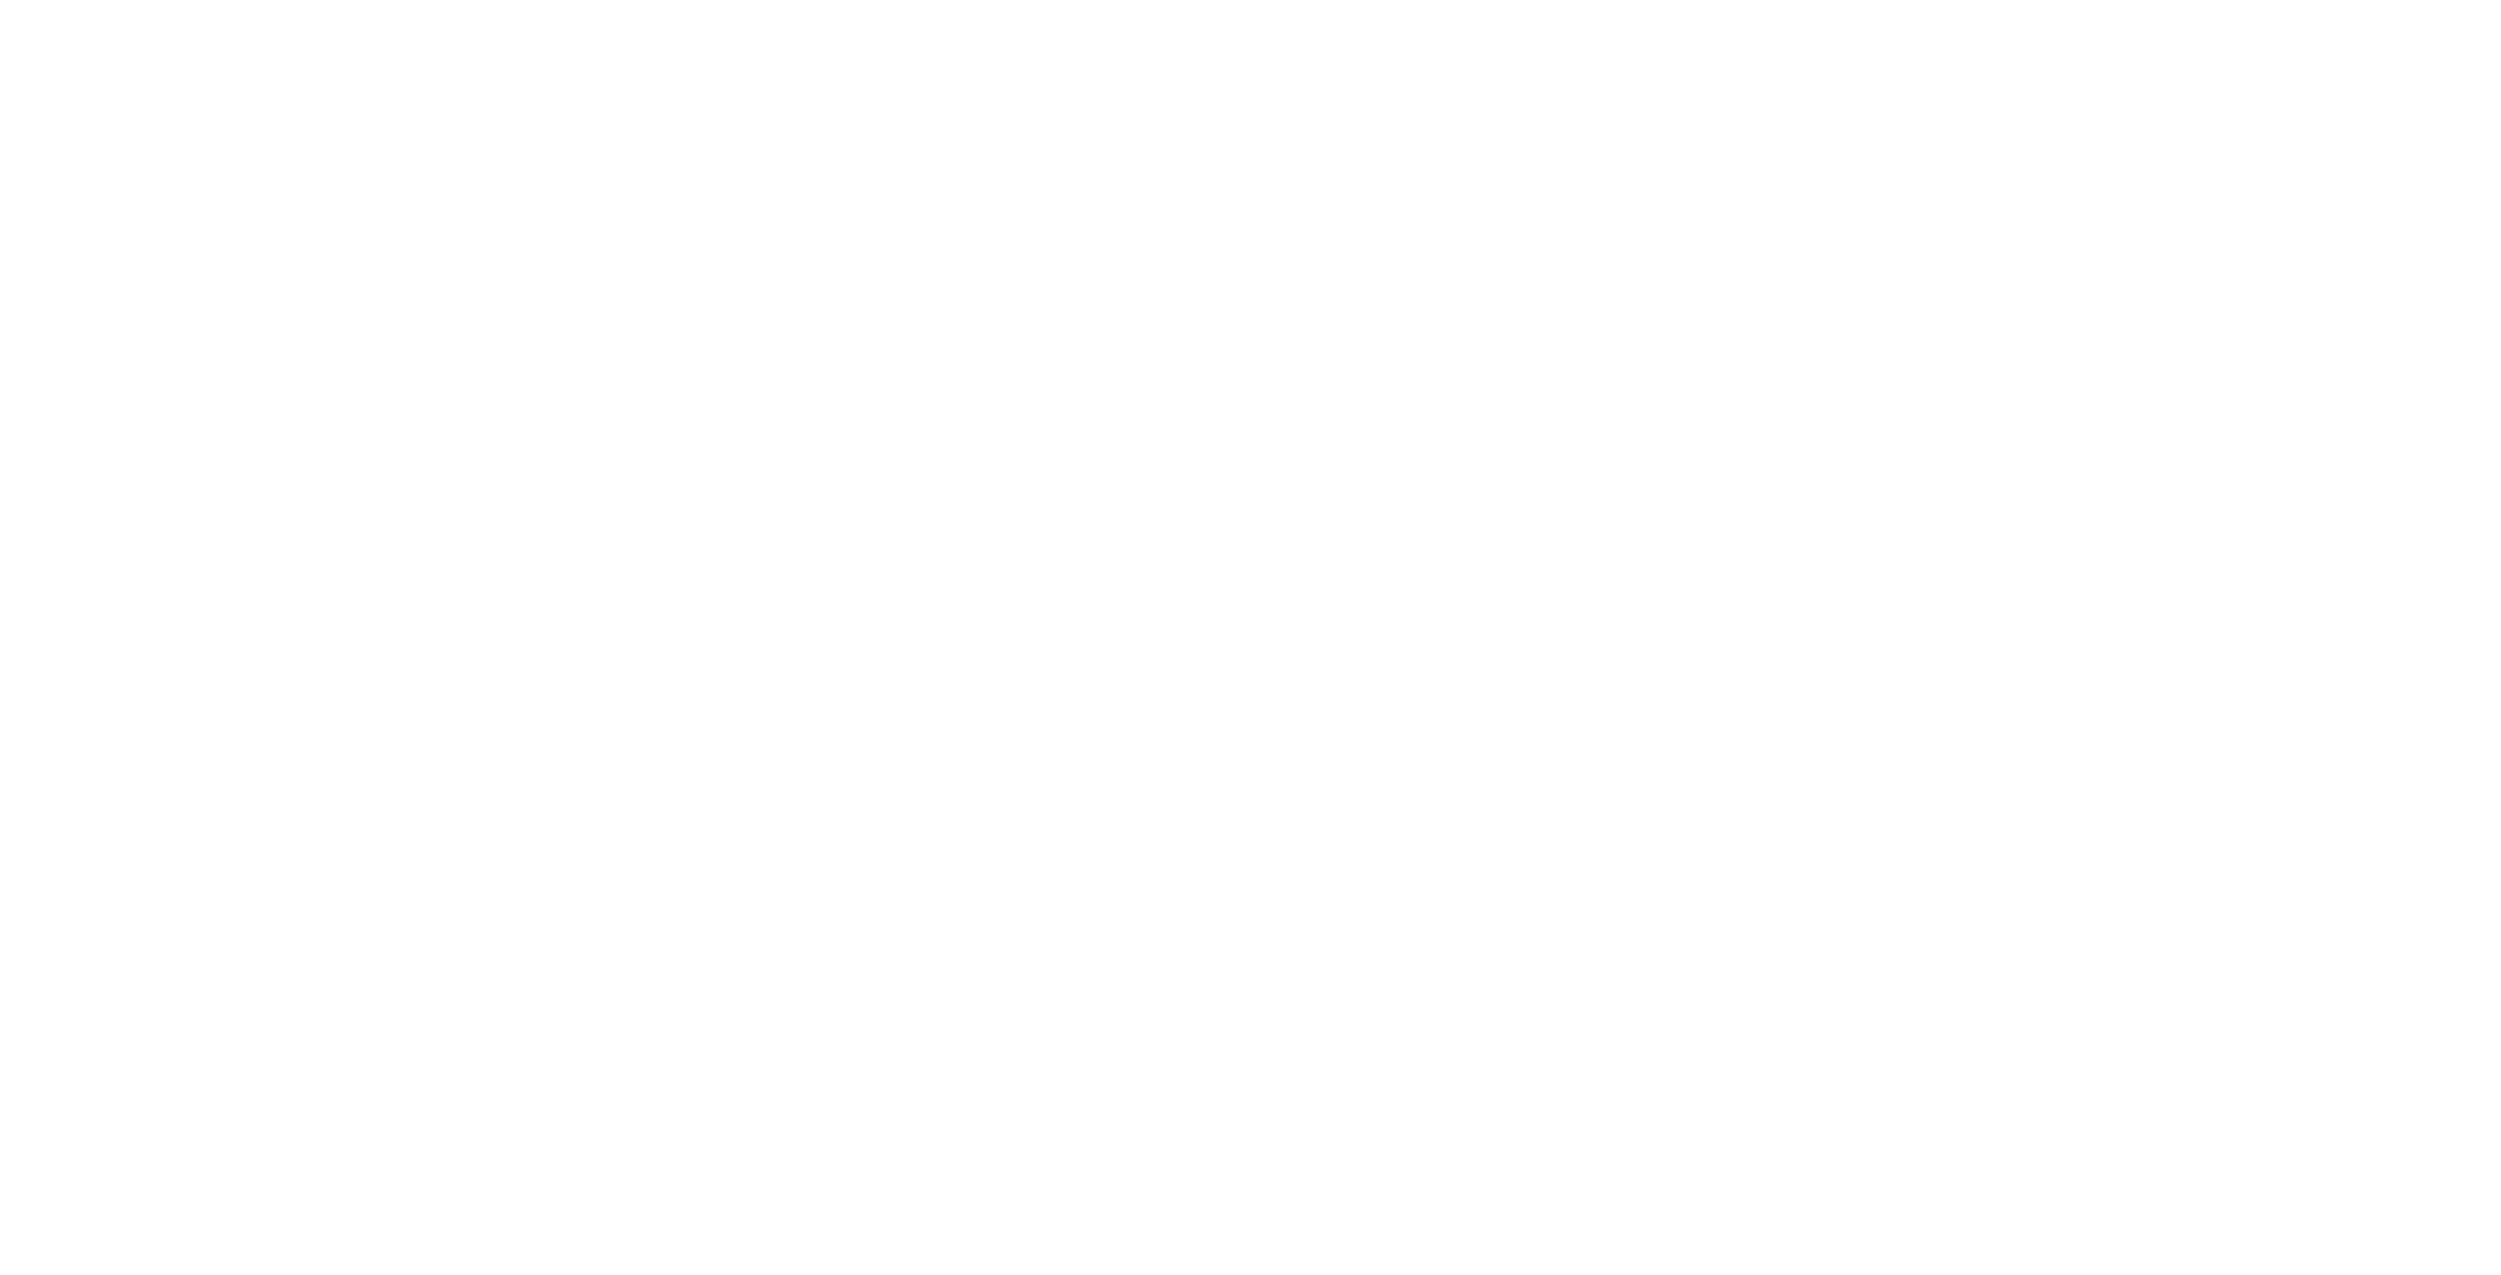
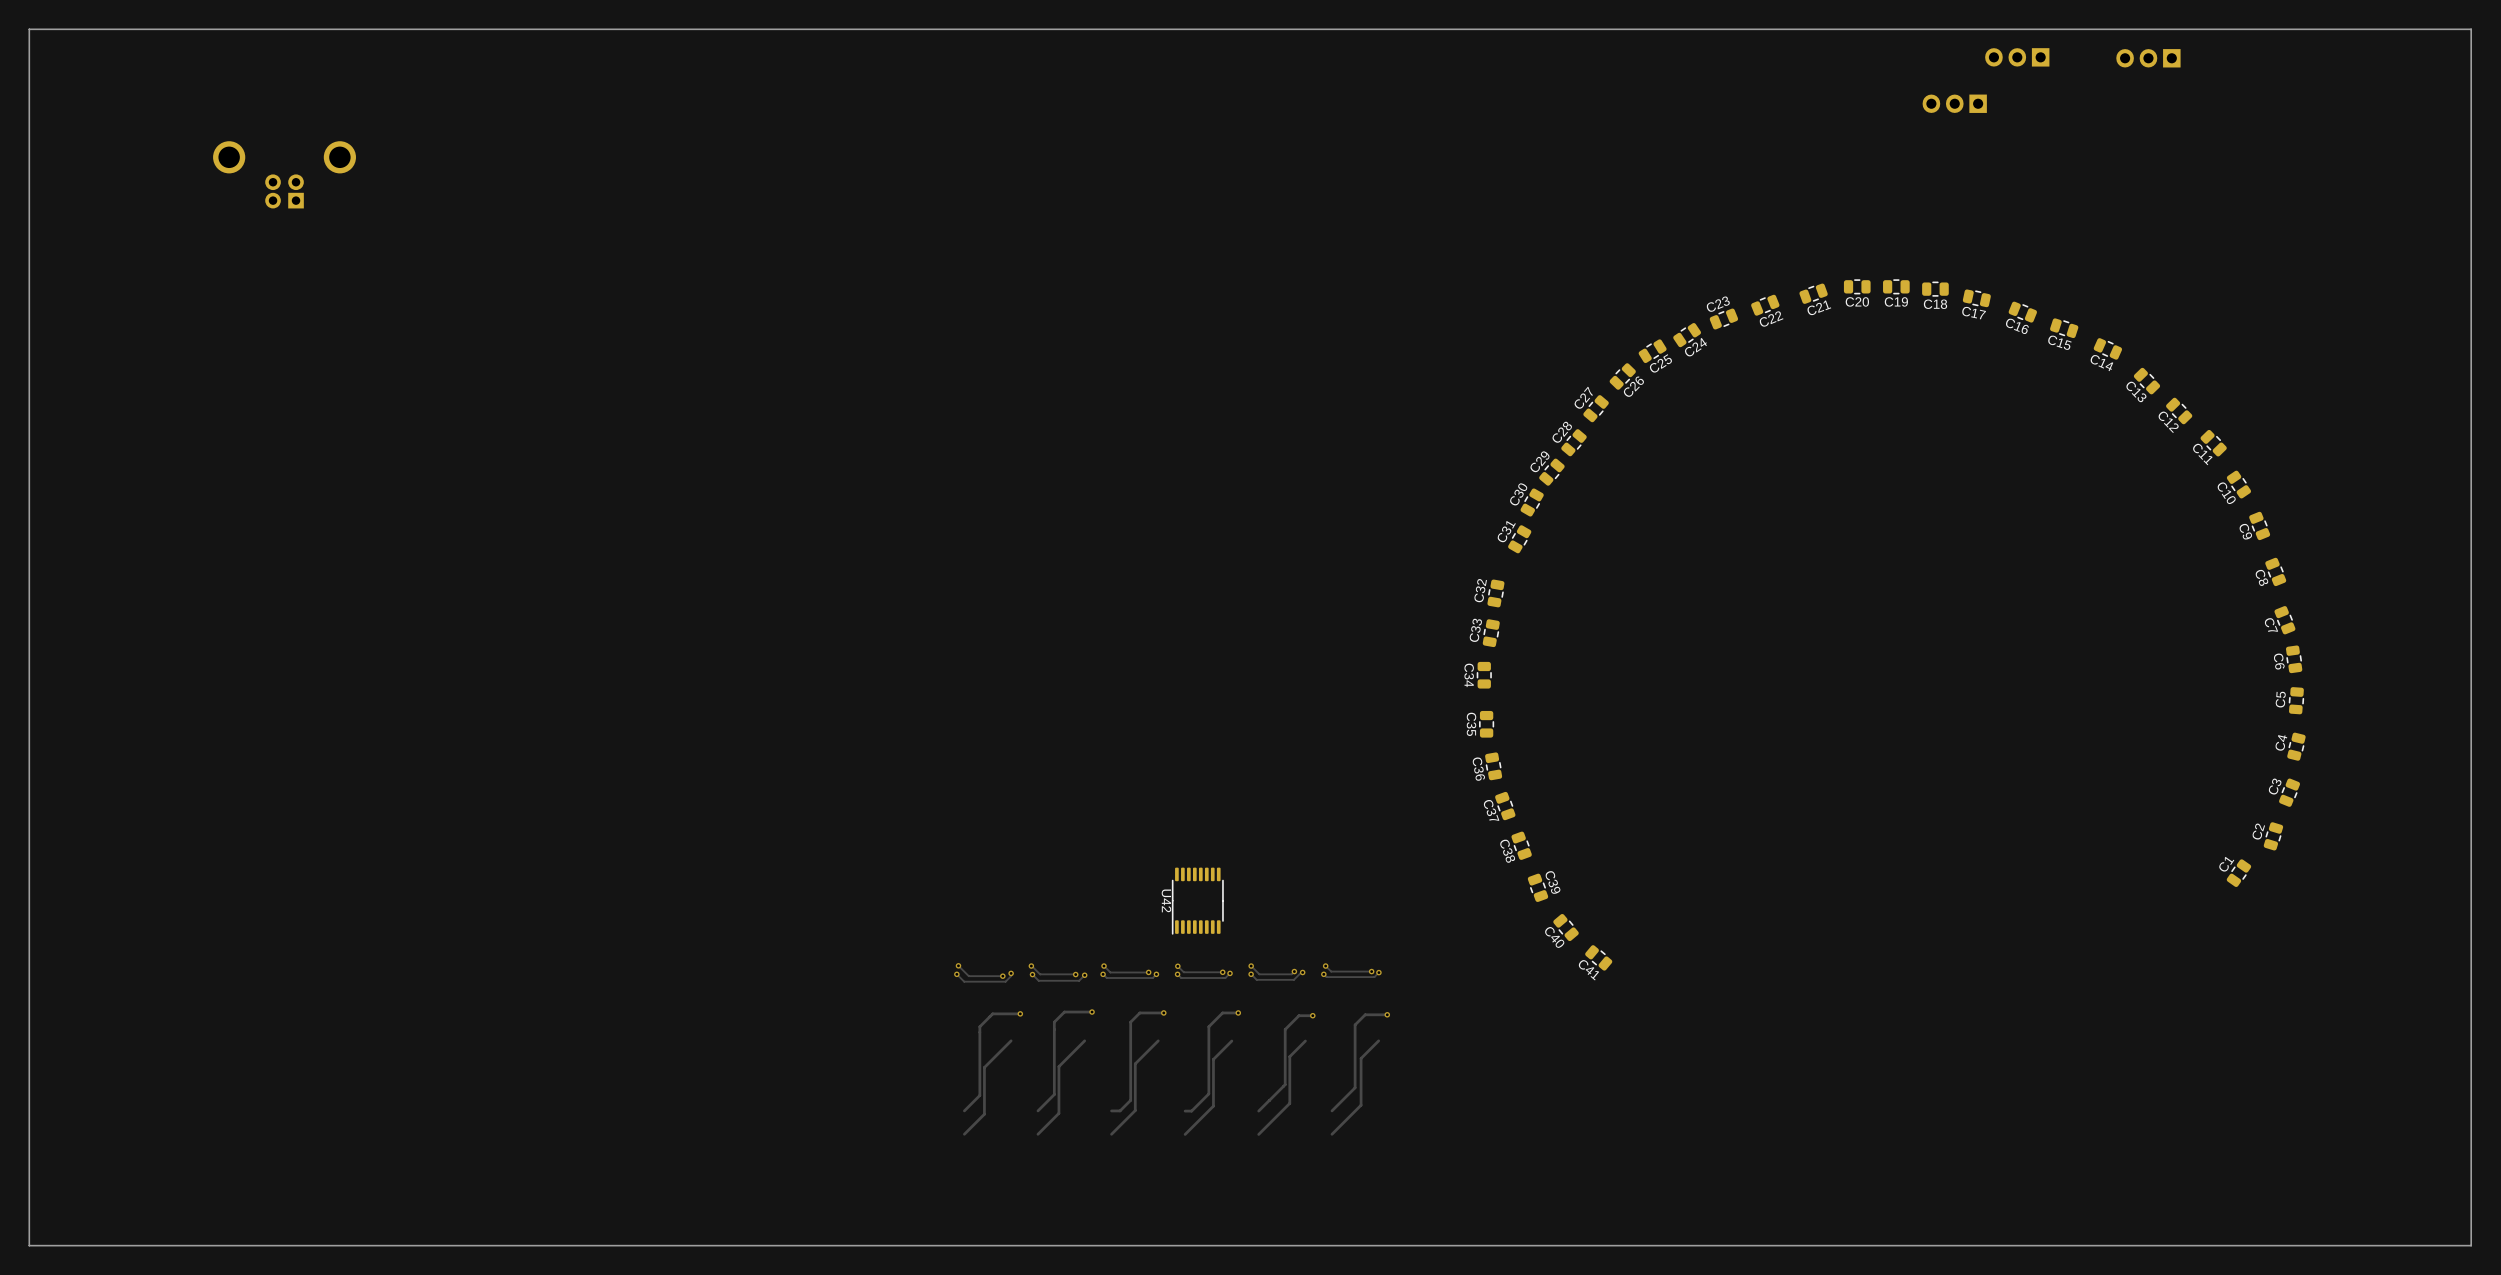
board edge: none -> (2471, 29) (29, 29) (29, 1245) (2471, 1245) (2471, 29)
part: none -> (2017, 57)
part: none -> (2148, 58)
part: none -> (1954, 103)
part: none -> (284, 174)
C20: none -> (1857, 286)
C19: none -> (1896, 286)
C18: none -> (1935, 289)
C21: none -> (1813, 293)
C17: none -> (1976, 298)
C22: none -> (1765, 305)
C16: none -> (2022, 312)
C23: none -> (1723, 319)
C15: none -> (2064, 328)
C24: none -> (1687, 335)
C14: none -> (2107, 348)
C25: none -> (1652, 351)
C26: none -> (1622, 376)
C13: none -> (2146, 381)
C27: none -> (1596, 408)
C12: none -> (2179, 410)
C28: none -> (1573, 442)
C11: none -> (2213, 443)
C29: none -> (1551, 472)
C10: none -> (2238, 484)
C30: none -> (1532, 502)
C9: none -> (2259, 525)
C31: none -> (1519, 539)
C8: none -> (2275, 571)
C32: none -> (1495, 593)
C7: none -> (2284, 620)
C33: none -> (1491, 633)
C6: none -> (2294, 659)
C34: none -> (1484, 675)
C5: none -> (2296, 700)
C35: none -> (1486, 724)
C4: none -> (2296, 746)
C36: none -> (1493, 766)
C3: none -> (2289, 792)
C37: none -> (1505, 806)
C2: none -> (2273, 836)
C38: none -> (1521, 845)
C1: none -> (2238, 873)
C39: none -> (1537, 887)
U42: none -> (1197, 901)
C40: none -> (1566, 927)
C41: none -> (1598, 957)
track: none -> (958, 965) (968, 976) (1002, 976)
via: none -> (958, 965)
track: none -> (1031, 966) (1040, 974) (1075, 974)
via: none -> (1031, 966)
track: none -> (1104, 966) (1110, 972) (1148, 972)
via: none -> (1104, 966)
track: none -> (1177, 966) (1183, 972) (1222, 972)
via: none -> (1177, 966)
track: none -> (1251, 966) (1259, 974) (1291, 974) (1294, 971)
via: none -> (1251, 966)
track: none -> (1325, 966) (1331, 971) (1371, 971)
via: none -> (1325, 966)
via: none -> (1294, 971)
via: none -> (1371, 971)
via: none -> (1148, 972)
via: none -> (1222, 972)
track: none -> (1302, 972) (1293, 979) (1256, 979) (1251, 974)
via: none -> (1302, 972)
track: none -> (1378, 972) (1374, 977) (1326, 977) (1323, 974)
via: none -> (1378, 972)
track: none -> (1011, 973) (1011, 976) (1005, 981) (964, 981) (956, 974)
via: none -> (1011, 973)
track: none -> (1230, 973) (1225, 978) (1181, 978) (1177, 974)
via: none -> (1230, 973)
via: none -> (956, 974)
track: none -> (1032, 974) (1038, 980) (1079, 980) (1084, 975)
via: none -> (1032, 974)
via: none -> (1075, 974)
via: none -> (1103, 974)
track: none -> (1156, 974) (1152, 978) (1106, 978) (1103, 974)
via: none -> (1156, 974)
via: none -> (1177, 974)
via: none -> (1251, 974)
via: none -> (1323, 974)
via: none -> (1084, 975)
via: none -> (1002, 976)
track: none -> (1092, 1012) (1064, 1012) (1054, 1022) (1054, 1094) (1037, 1110)
via: none -> (1092, 1012)
track: none -> (1163, 1012) (1139, 1012) (1130, 1022) (1130, 1100) (1120, 1110) (1111, 1110)
via: none -> (1163, 1012)
track: none -> (1238, 1012) (1222, 1012) (1208, 1026) (1208, 1093) (1191, 1111) (1185, 1111)
via: none -> (1238, 1012)
track: none -> (1020, 1013) (992, 1013) (979, 1026) (979, 1095) (964, 1110)
via: none -> (1020, 1013)
track: none -> (1387, 1014) (1365, 1014) (1355, 1024) (1355, 1087) (1331, 1110)
via: none -> (1387, 1014)
track: none -> (1312, 1015) (1298, 1015) (1285, 1029) (1285, 1084) (1258, 1111)
via: none -> (1312, 1015)
track: none -> (1011, 1040) (984, 1067) (984, 1114) (964, 1134)
track: none -> (1084, 1040) (1058, 1066) (1058, 1113) (1037, 1134)
track: none -> (1158, 1040) (1135, 1063) (1135, 1110) (1111, 1134)
track: none -> (1378, 1040) (1361, 1058) (1361, 1105) (1331, 1134)
track: none -> (1231, 1041) (1213, 1059) (1213, 1106) (1185, 1134)
track: none -> (1305, 1041) (1289, 1056) (1289, 1103) (1258, 1134)

